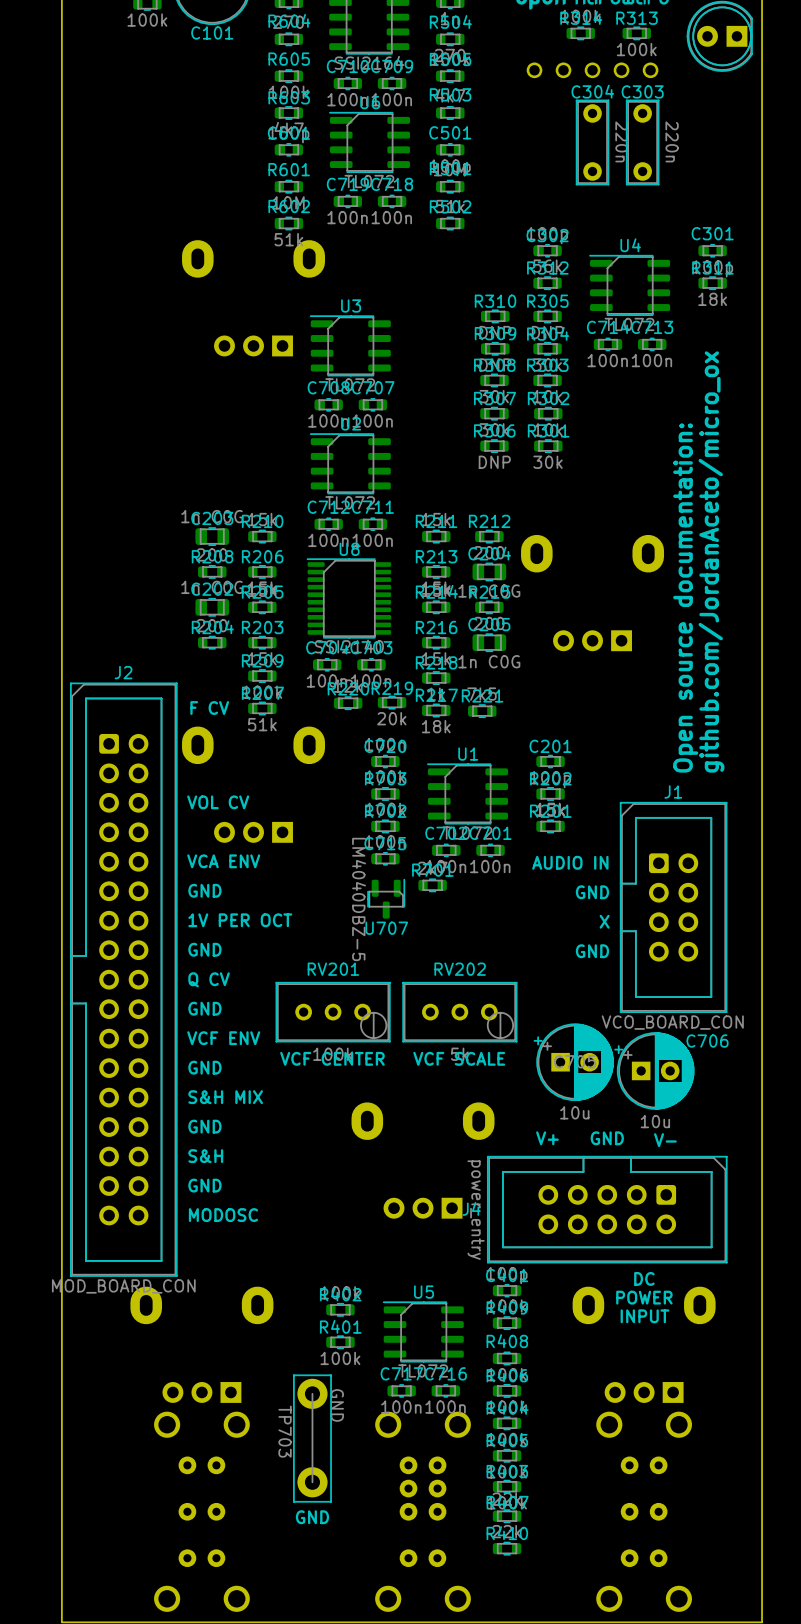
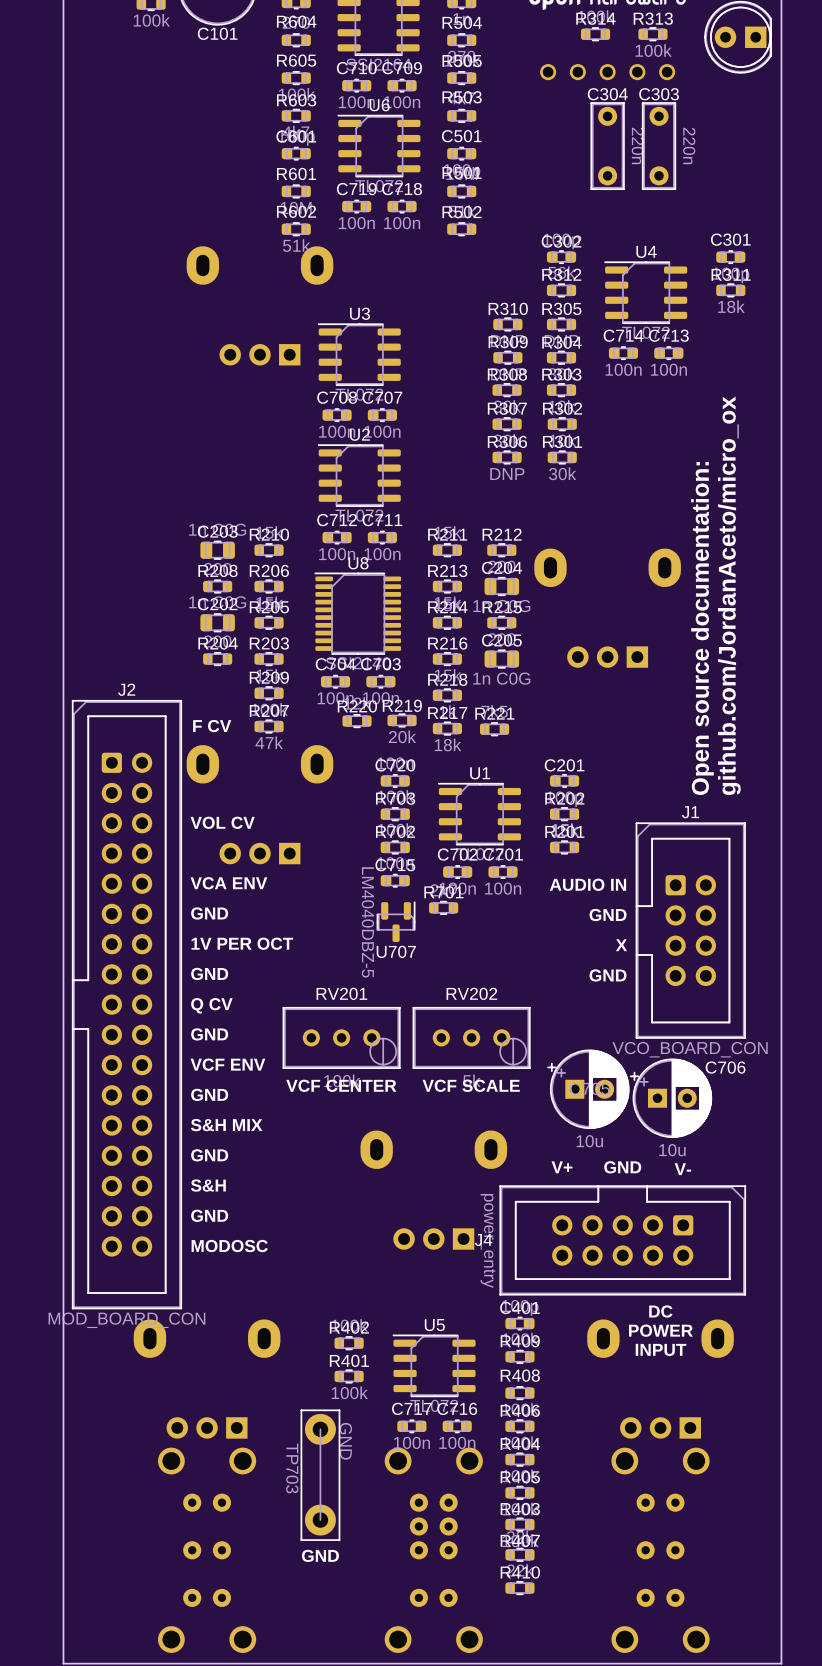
R207 value: 51k (262, 724) -> 47k (269, 742)

